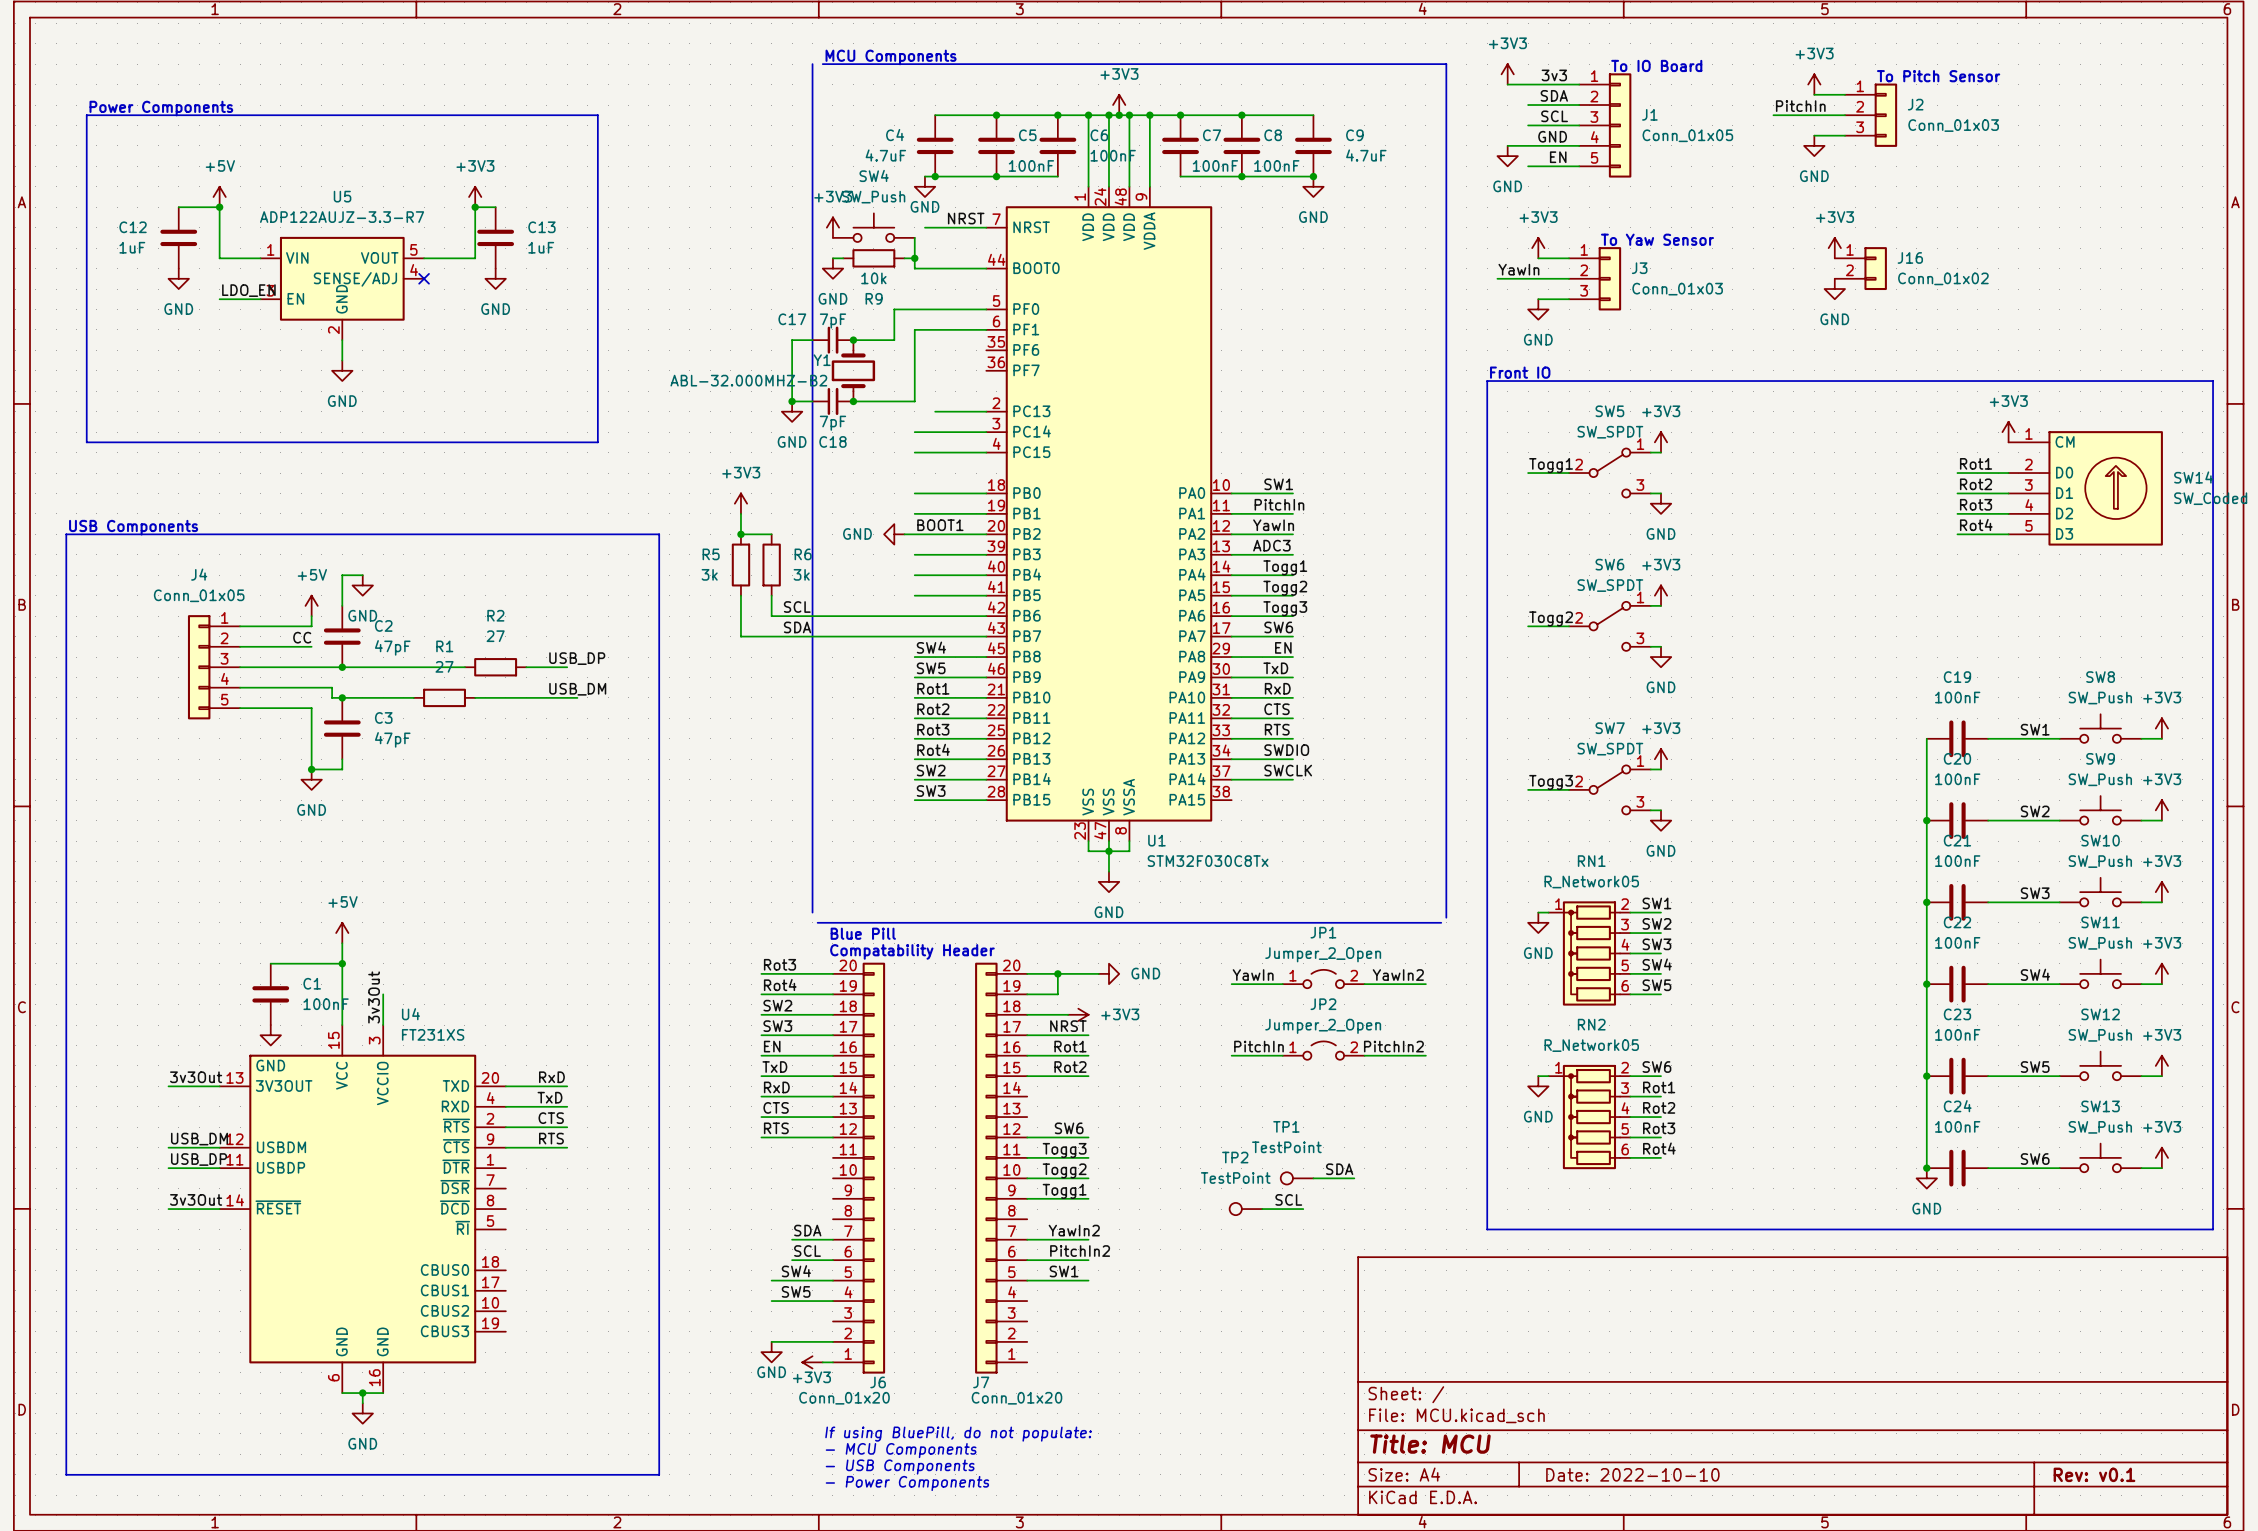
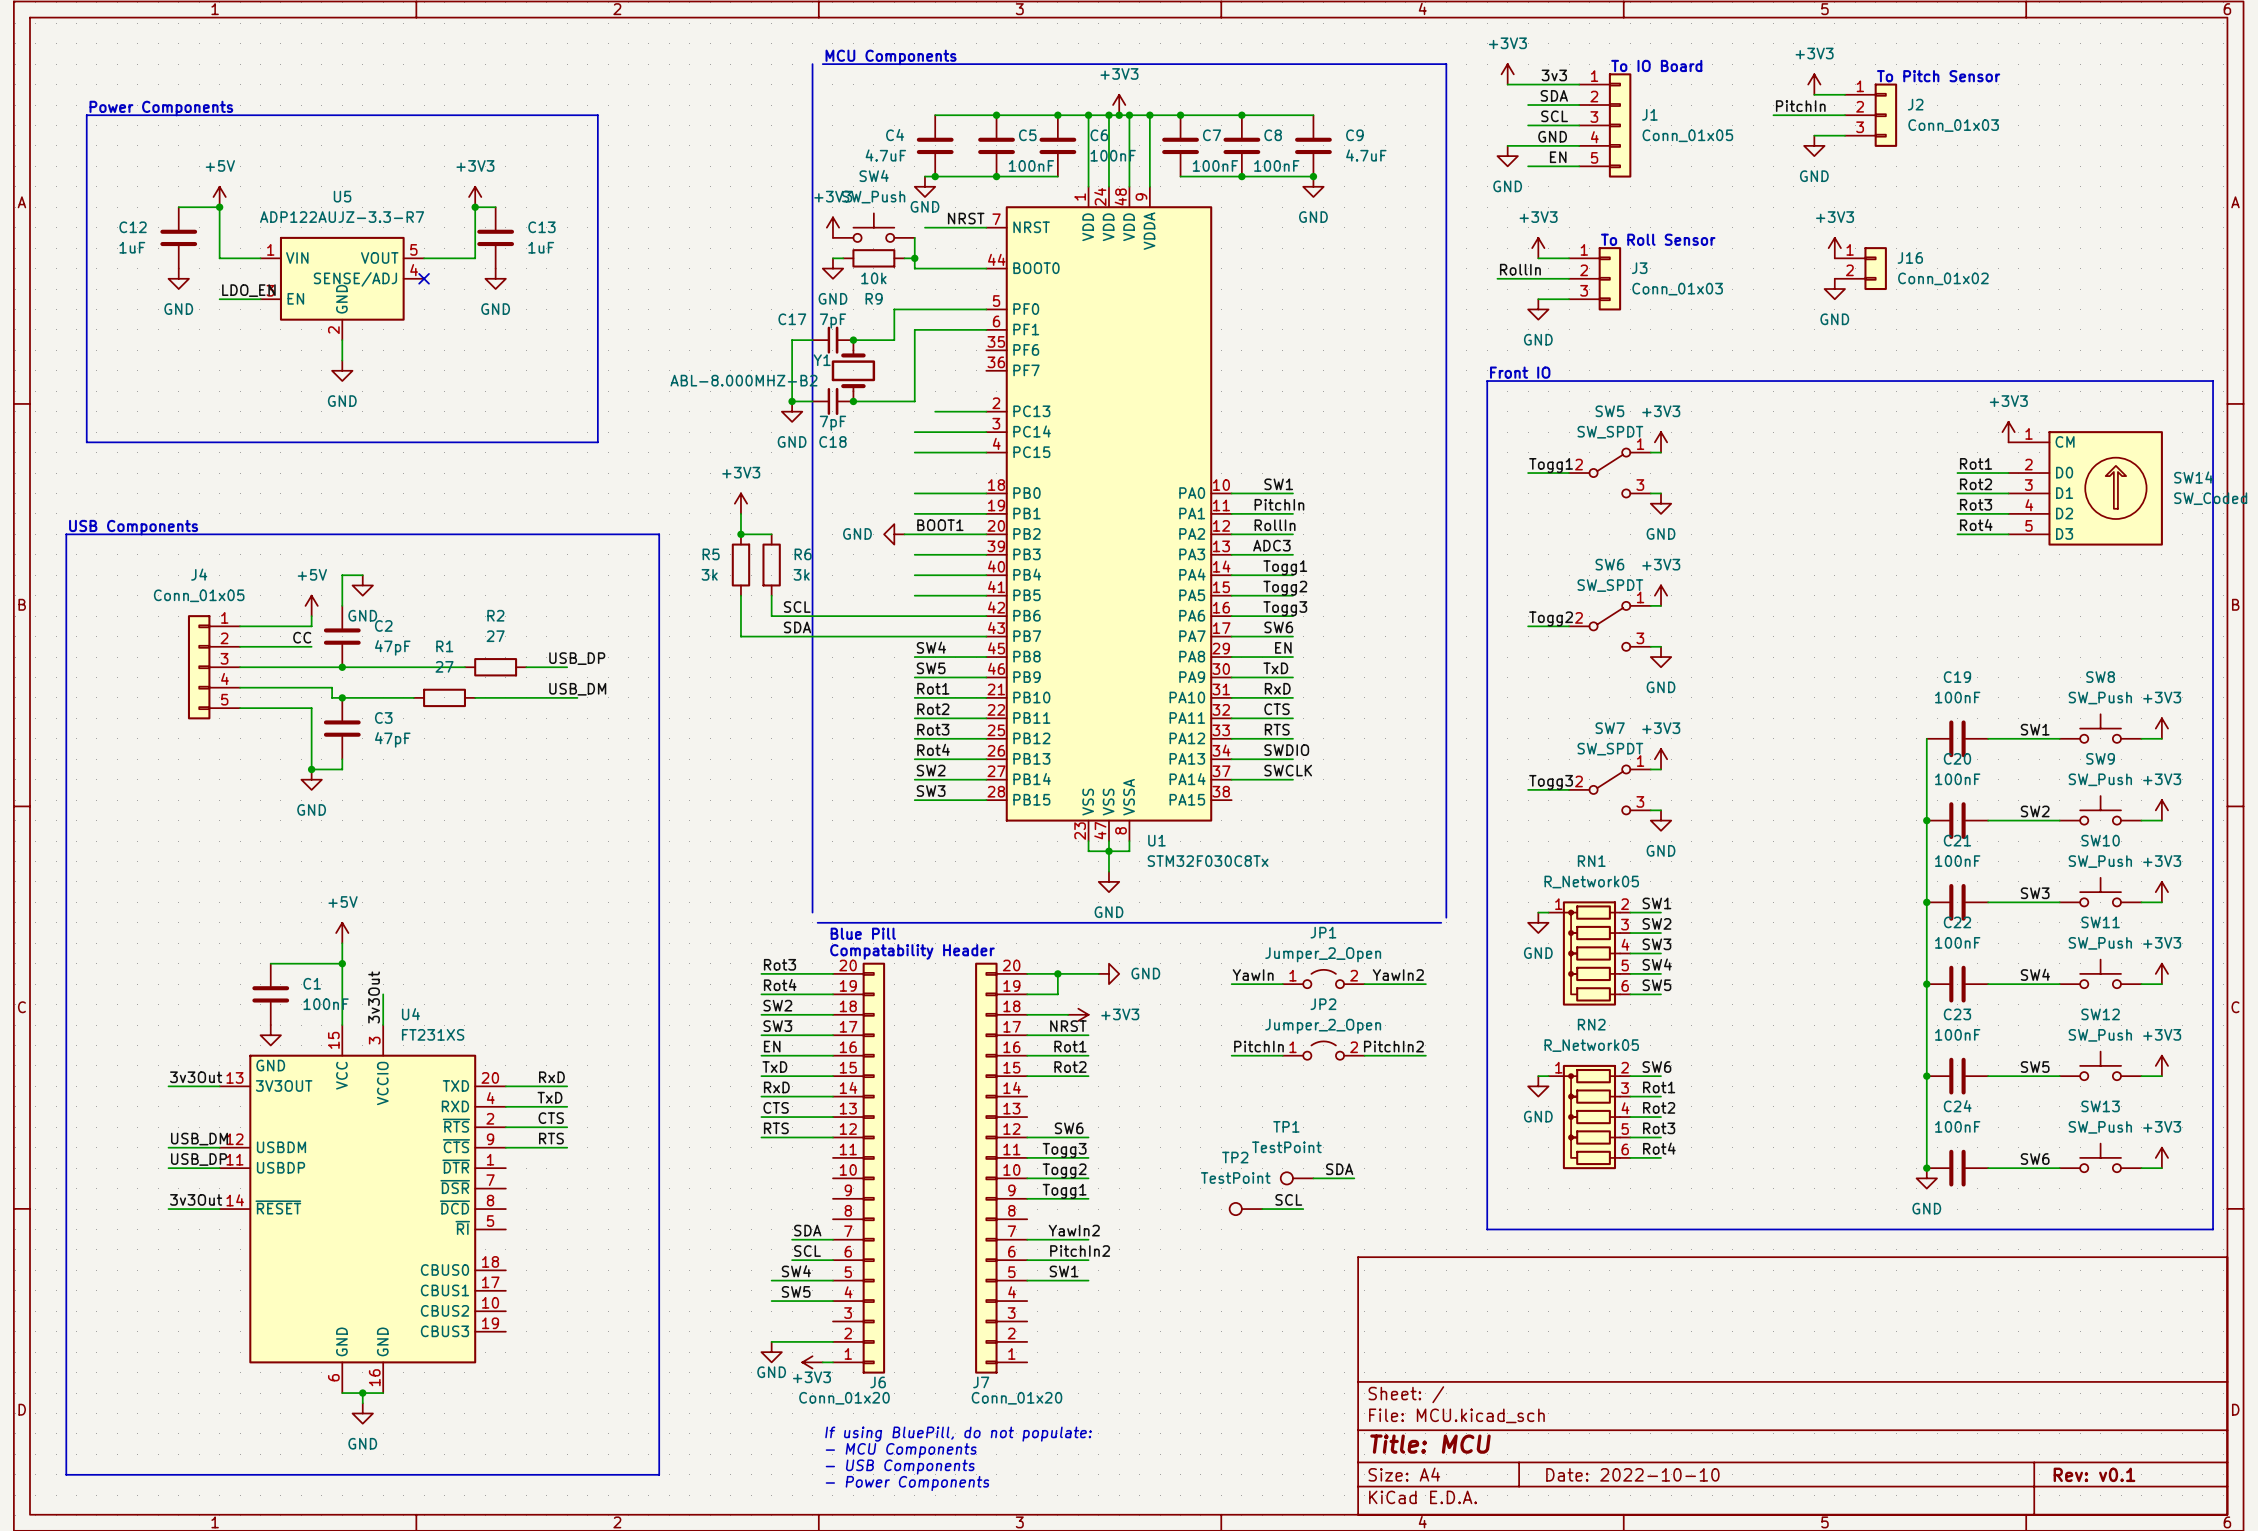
text: To Yaw Sensor (1657, 239) -> To Roll Sensor (1658, 239)
label: YawIn (1518, 269) -> RollIn (1520, 269)
Y1 value: ABL-32.000MHZ-B2 (748, 380) -> ABL-8.000MHZ-B2 (743, 380)
label: YawIn (1273, 525) -> RollIn (1275, 525)

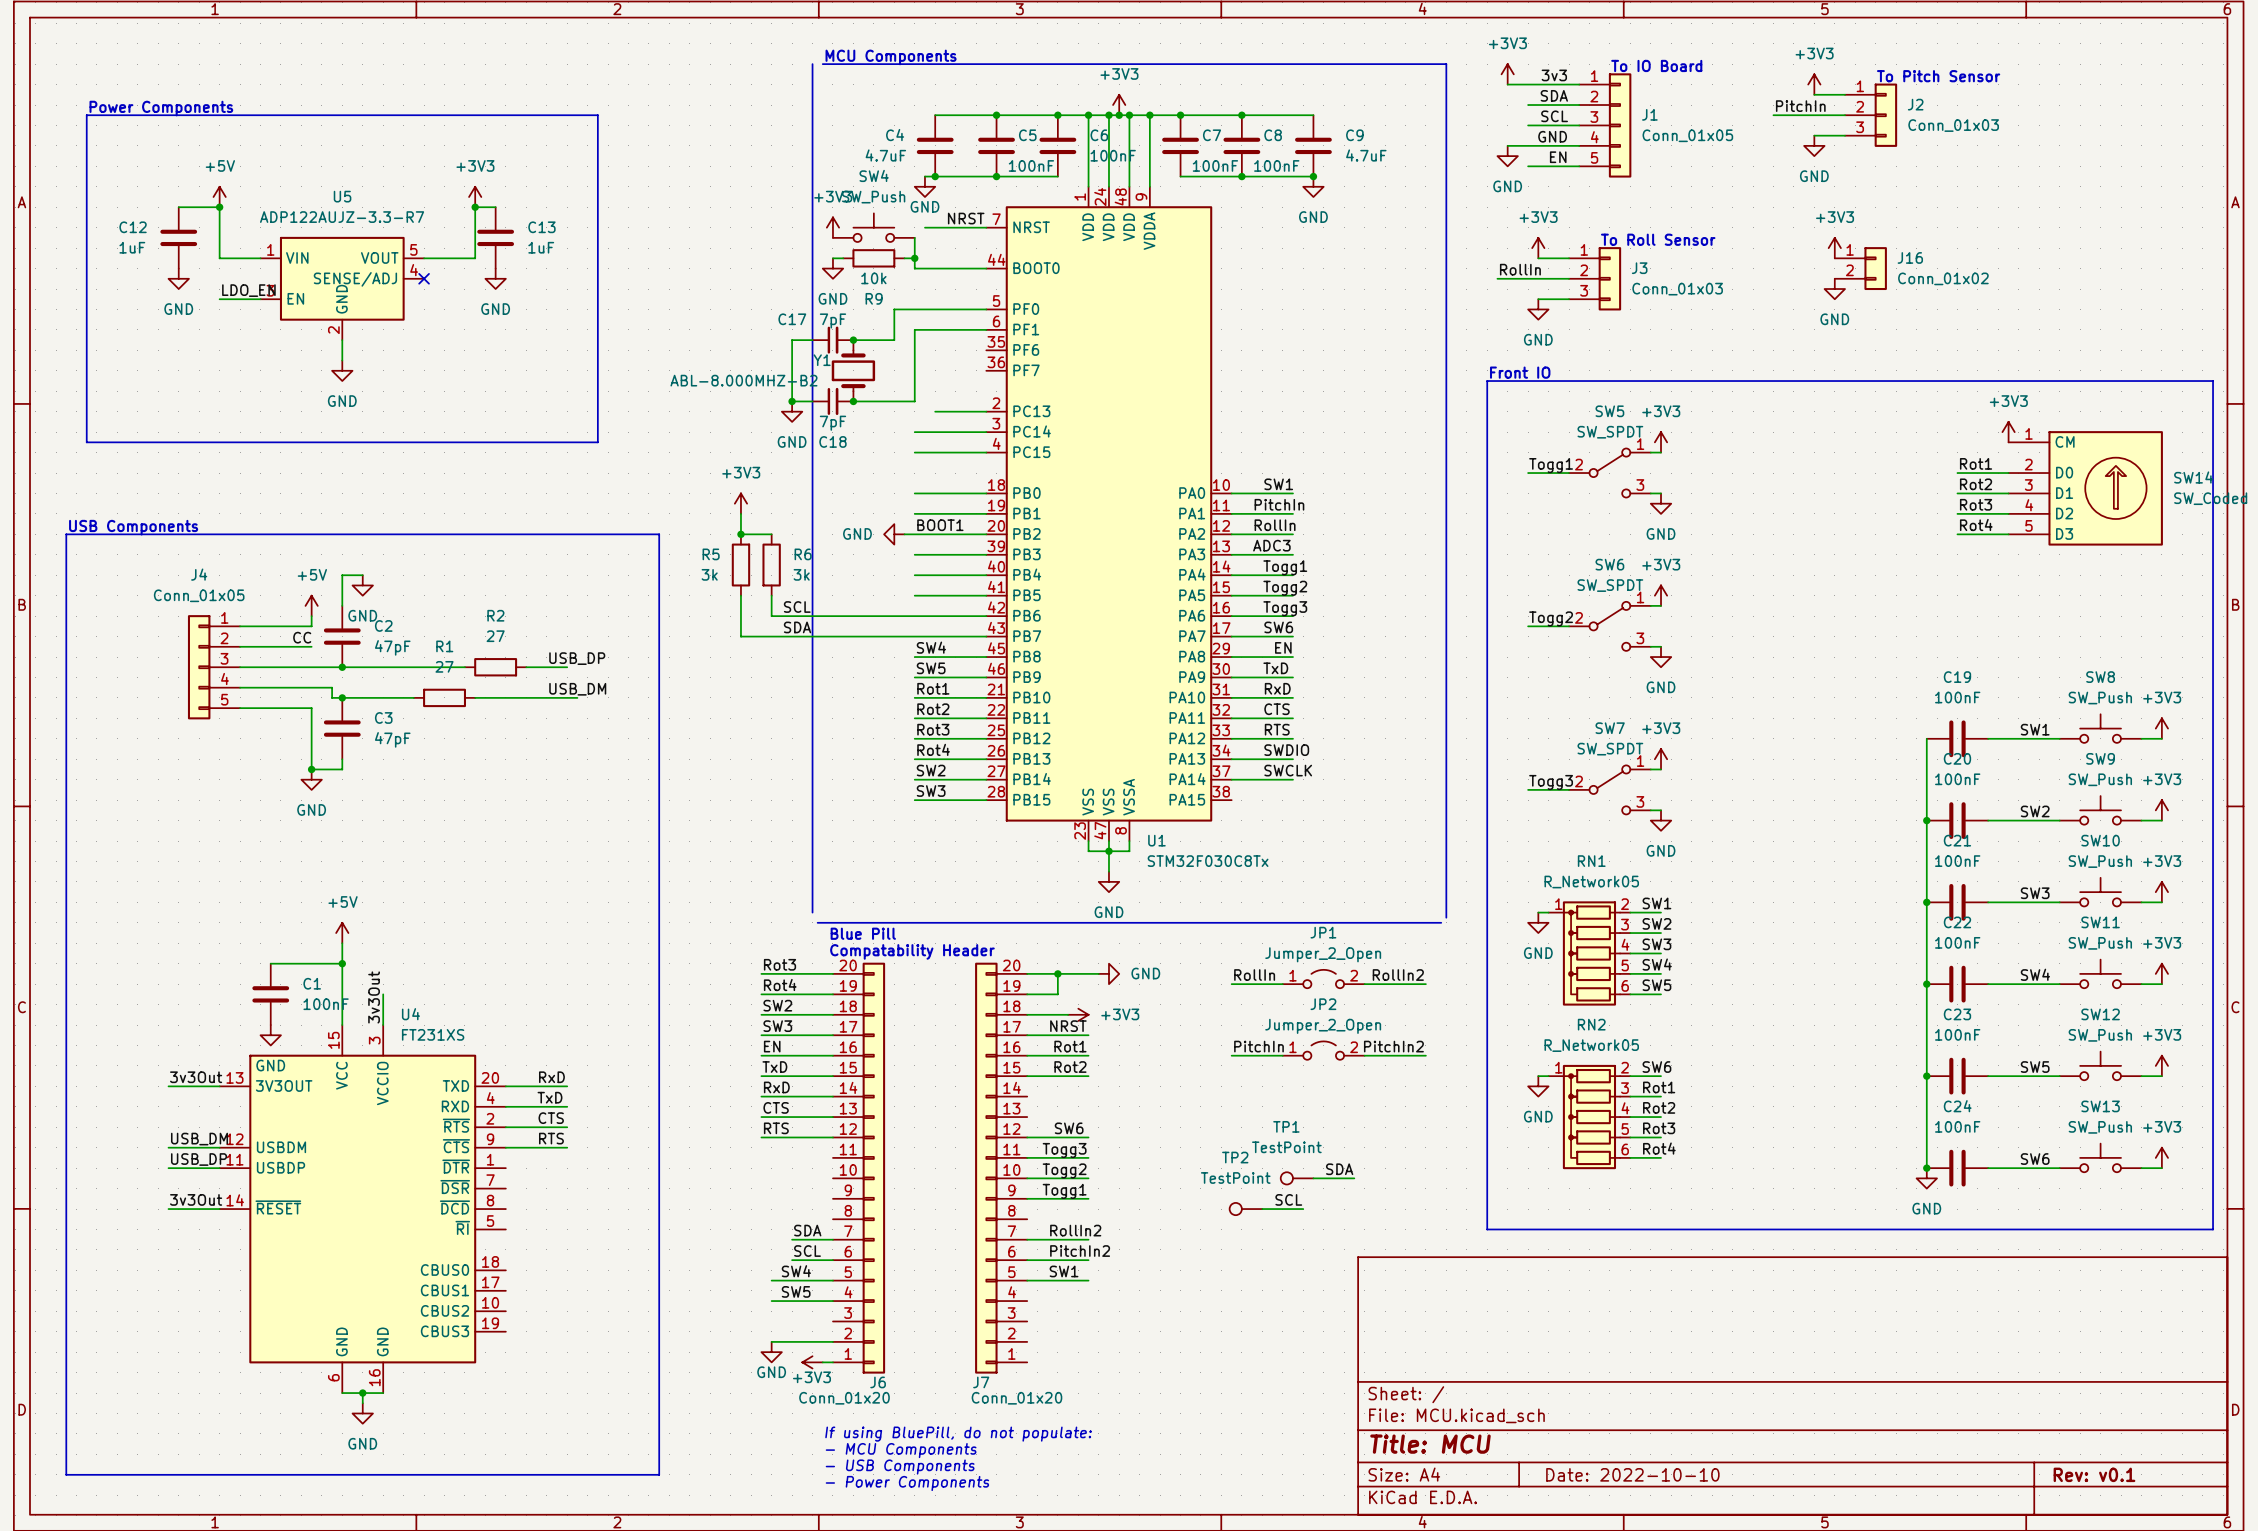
label: YawIn (1253, 975) -> RollIn (1254, 975)
label: YawIn2 (1398, 975) -> RollIn2 (1398, 975)
label: YawIn2 (1074, 1230) -> RollIn2 (1075, 1230)

